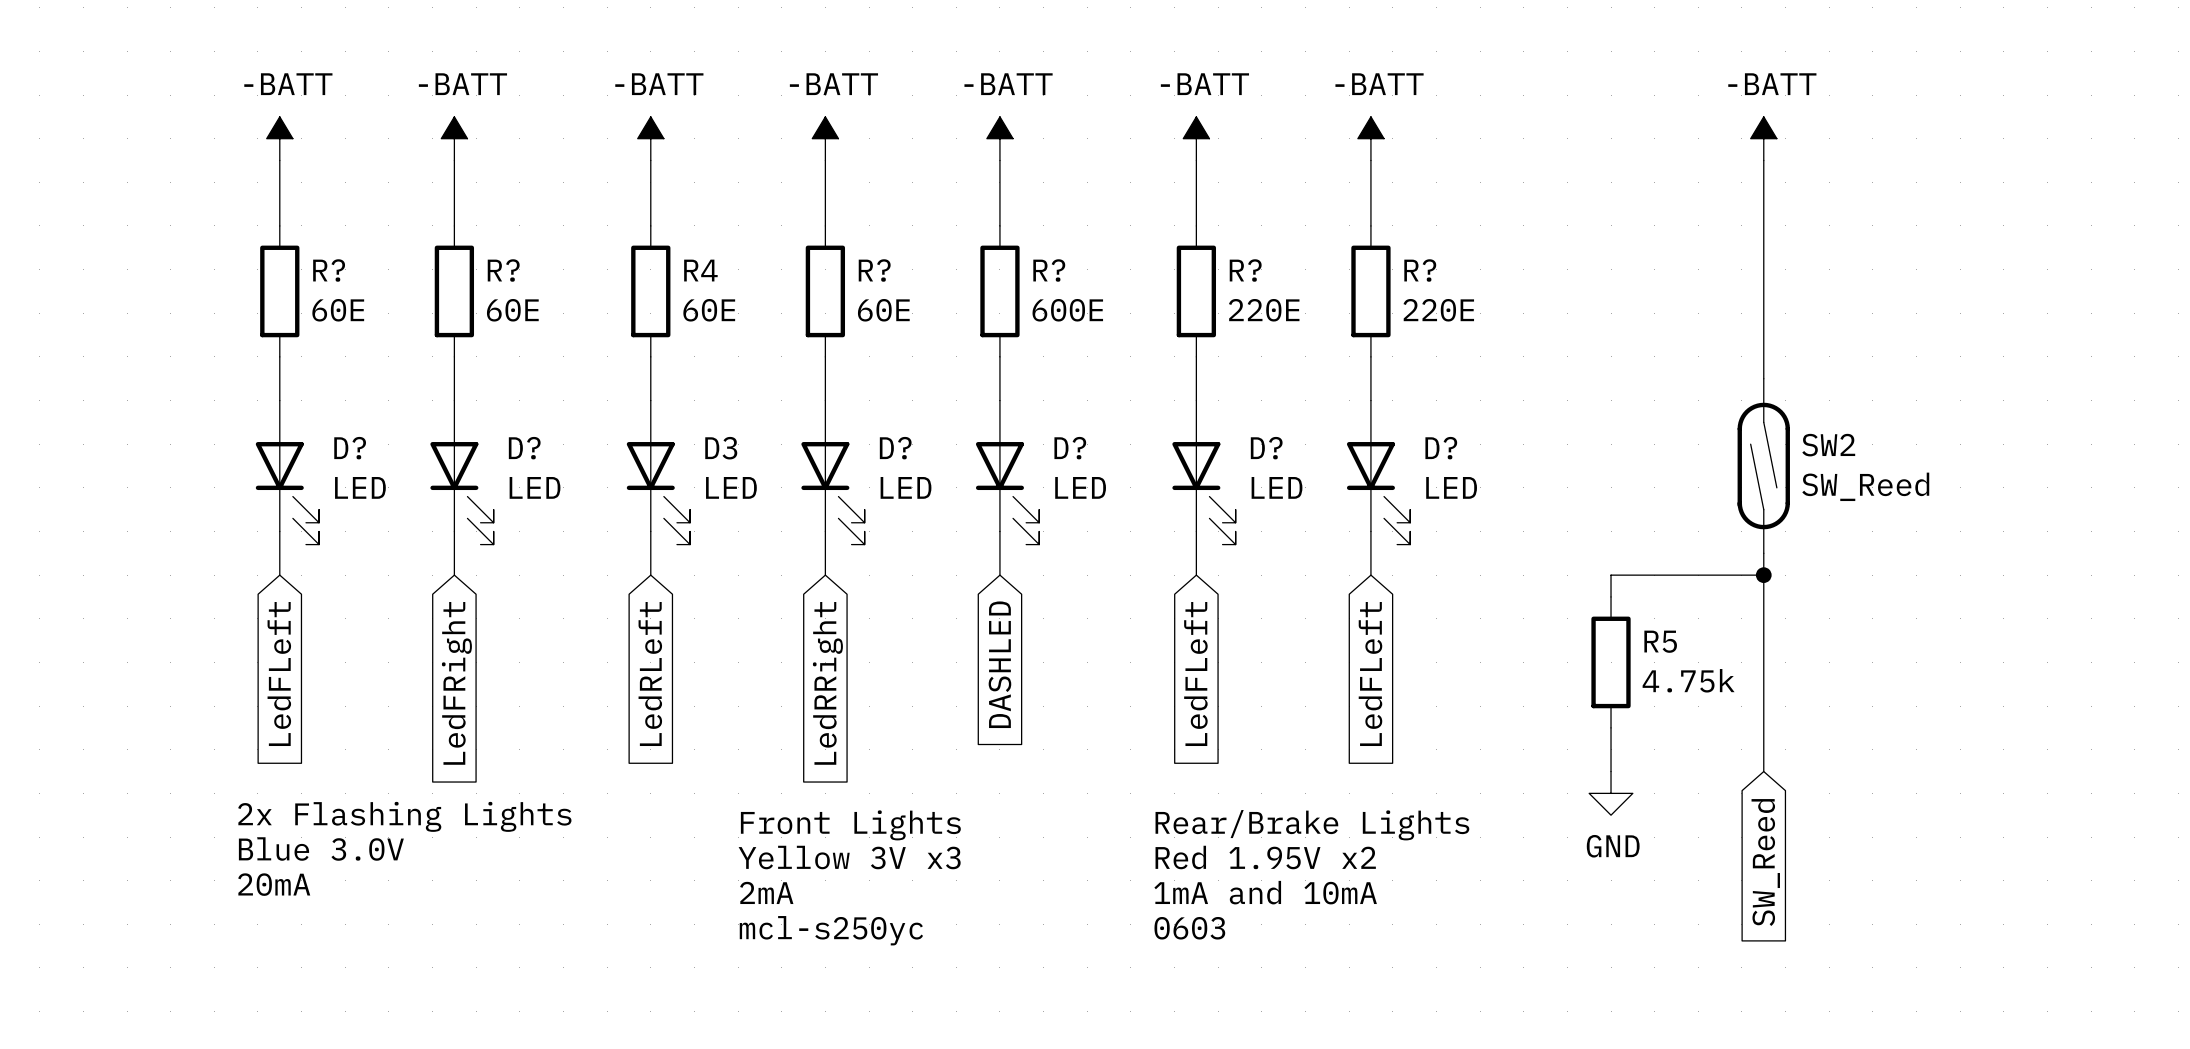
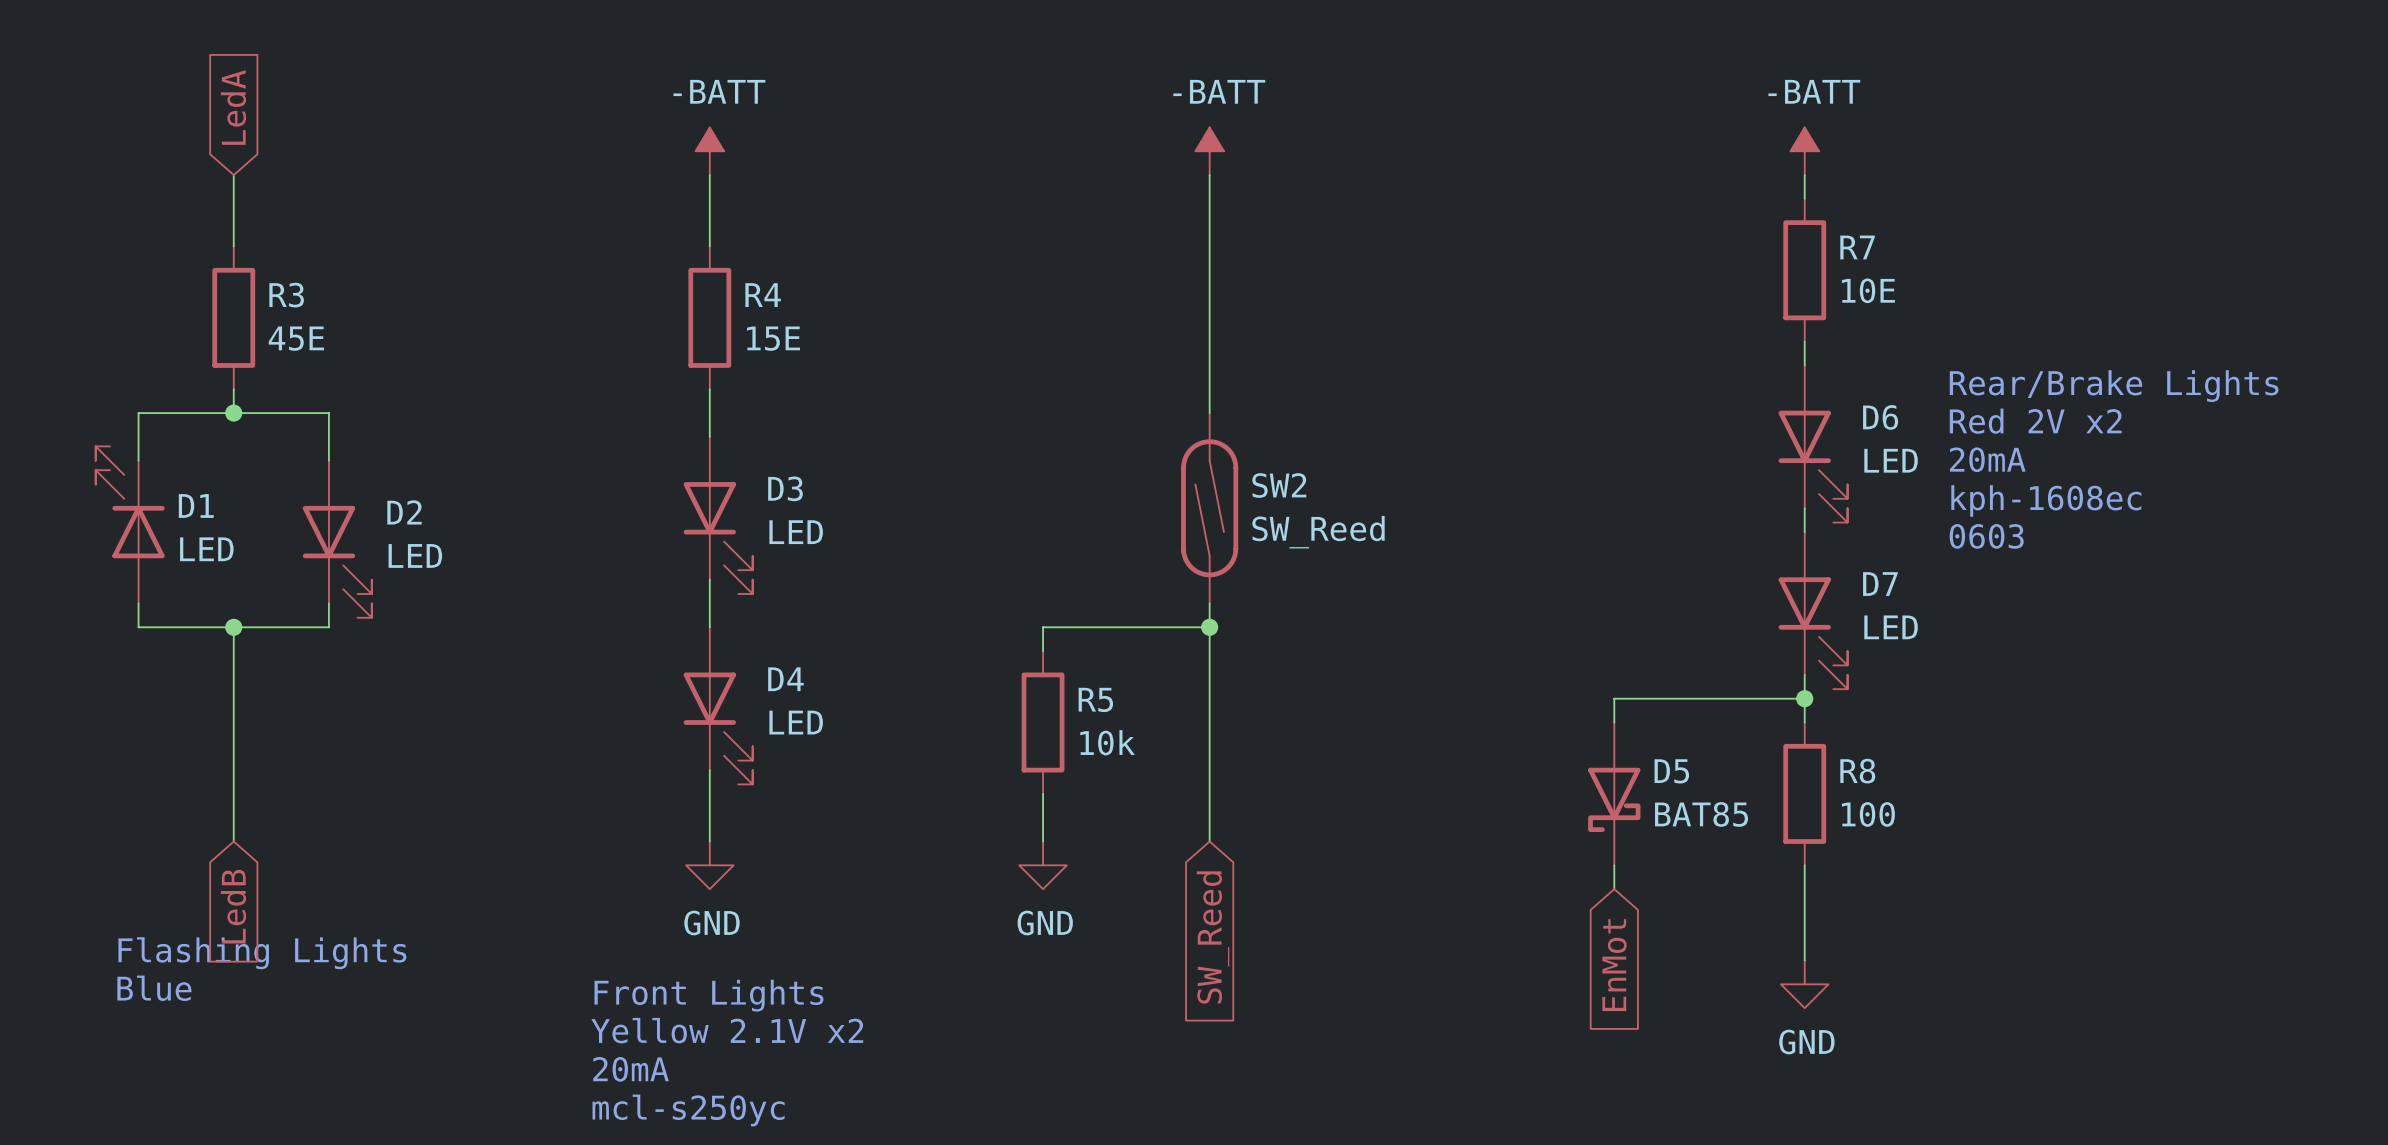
global label: none -> LedA (233, 107)
power symbol: -BATT (279, 138) -> none
power symbol: -BATT (454, 138) -> none
power symbol: -BATT (825, 138) -> none
power symbol: -BATT (999, 138) -> none
power symbol: none -> -BATT (1209, 151)
power symbol: -BATT (1196, 138) -> none
power symbol: -BATT (1370, 138) -> none
power symbol position: -BATT (1763, 138) -> -BATT (1804, 151)
wire: (279, 160) (279, 225) -> (233, 175) (233, 246)
wire: (454, 160) (454, 225) -> none
wire: (825, 160) (825, 225) -> none
wire: (999, 160) (999, 225) -> none
wire: none -> (1209, 175) (1209, 413)
wire: (1196, 160) (1196, 225) -> none
wire: (1370, 160) (1370, 225) -> none
wire: none -> (1804, 175) (1804, 198)
wire: (1763, 160) (1763, 378) -> none
R7: none -> 10E (1804, 270)
R3: none -> 45E (233, 317)
R?: 60E (279, 291) -> none
R?: 60E (454, 291) -> none
R?: 60E (825, 291) -> none
R?: 600E (999, 291) -> none
R?: 220E (1196, 291) -> none
R?: 220E (1370, 291) -> none
R4 value: 60E (709, 310) -> 15E (773, 338)
wire: none -> (1804, 341) (1804, 365)
text: none -> Rear/Brake Lights (2114, 386)
wire: none -> (233, 389) (233, 413)
wire: (279, 356) (279, 400) -> none
wire: (454, 356) (454, 400) -> none
wire: (825, 356) (825, 400) -> none
wire: (999, 356) (999, 400) -> none
wire: (1196, 356) (1196, 400) -> none
wire: (1370, 356) (1370, 400) -> none
junction: none -> (233, 413)
text: none -> Red 2V x2 (2035, 421)
D6: none -> LED (1813, 444)
text: none -> 20mA (1987, 459)
wire: none -> (138, 460) (138, 413) (328, 413) (328, 460)
text: none -> kph-1608ec (2046, 500)
wire: none -> (1804, 508) (1804, 532)
SW2 position: (1763, 466) -> (1209, 508)
D?: LED (287, 472) -> none
D?: LED (462, 472) -> none
D?: LED (833, 472) -> none
D?: LED (1007, 472) -> none
D?: LED (1204, 472) -> none
D?: LED (1378, 472) -> none
D1: none -> LED (130, 524)
text: none -> 0603 (1986, 536)
D2: none -> LED (337, 539)
wire: (279, 531) (279, 575) -> none
wire: (454, 531) (454, 575) -> none
wire: (825, 531) (825, 575) -> none
wire: (999, 531) (999, 575) -> (1043, 793) (1043, 841)
wire: (1196, 531) (1196, 575) -> none
wire: (1370, 531) (1370, 575) -> none
wire: none -> (138, 603) (138, 627) (328, 627) (328, 603)
wire: none -> (1209, 603) (1209, 841)
wire: (1763, 553) (1763, 771) -> none
D7: none -> LED (1813, 610)
wire: none -> (233, 627) (233, 841)
junction: none -> (233, 627)
wire: none -> (1209, 627) (1043, 627) (1043, 651)
junction: none -> (1209, 627)
wire: (1763, 575) (1611, 575) (1611, 596) -> none
junction: (1763, 575) -> none
wire: none -> (1804, 698) (1614, 698) (1614, 722)
junction: none -> (1804, 698)
D4: none -> LED (718, 705)
R5 position: (1611, 662) -> (1043, 722)
global label: DASHLED (999, 664) -> none
global label: LedFLeft (279, 674) -> none
global label: LedRLeft (650, 674) -> none
global label: LedFLeft (1195, 674) -> none
global label: LedFLeft (1370, 674) -> none
R5 value: 4.75k (1688, 680) -> 10k (1107, 742)
global label: LedFRight (456, 683) -> none
global label: LedRRight (827, 683) -> none
wire: none -> (709, 770) (709, 841)
D5: none -> BAT85 (1614, 793)
wire: (1611, 727) (1611, 771) -> (1804, 674) (1804, 722)
R8: none -> 100 (1804, 793)
power symbol: none -> GND (709, 865)
power symbol: none -> GND (1043, 865)
wire: none -> (1614, 865) (1614, 889)
power symbol position: GND (1611, 793) -> GND (1804, 984)
wire: none -> (1804, 865) (1804, 960)
text: 2x Flashing Lights (404, 816) -> none
text position: Front Lights (850, 825) -> Front Lights (708, 995)
text: Rear/Brake Lights (1312, 825) -> none
global label: none -> LedB (233, 906)
text: Blue 3.0V (321, 849) -> none
text: Yellow 3V x3 (849, 857) -> none
text: Red 1.95V x2 (1265, 857) -> none
global label: none -> SW_Reed (1213, 937)
global label: SW_Reed (1765, 862) -> none
text: none -> Flashing Lights (262, 953)
text position: 20mA (274, 884) -> 20mA (631, 1069)
global label: none -> EnMot (1614, 965)
text: 2mA (766, 892) -> none
text: 1mA and 10mA (1265, 892) -> none
text: none -> Blue (154, 988)
text: 0603 (1189, 928) -> none
text position: mcl-s250yc (831, 930) -> mcl-s250yc (688, 1110)
text: none -> Yellow 2.1V x2 (727, 1030)

